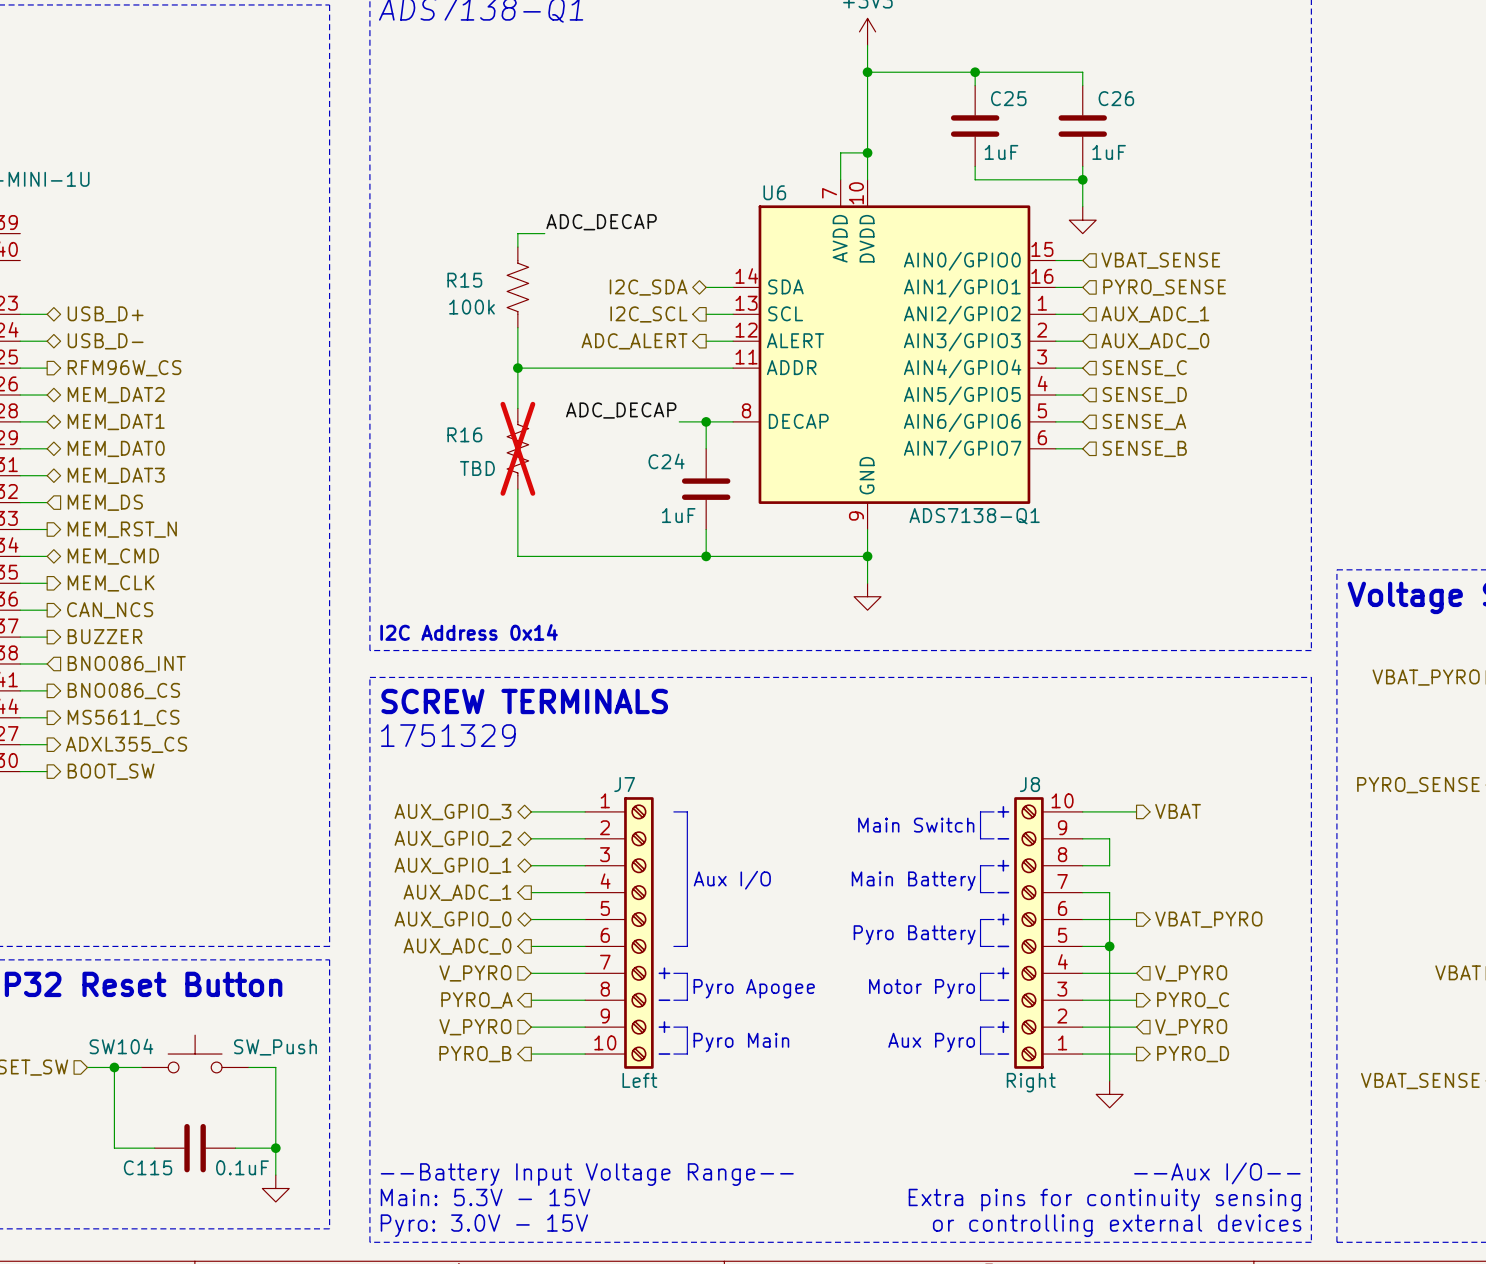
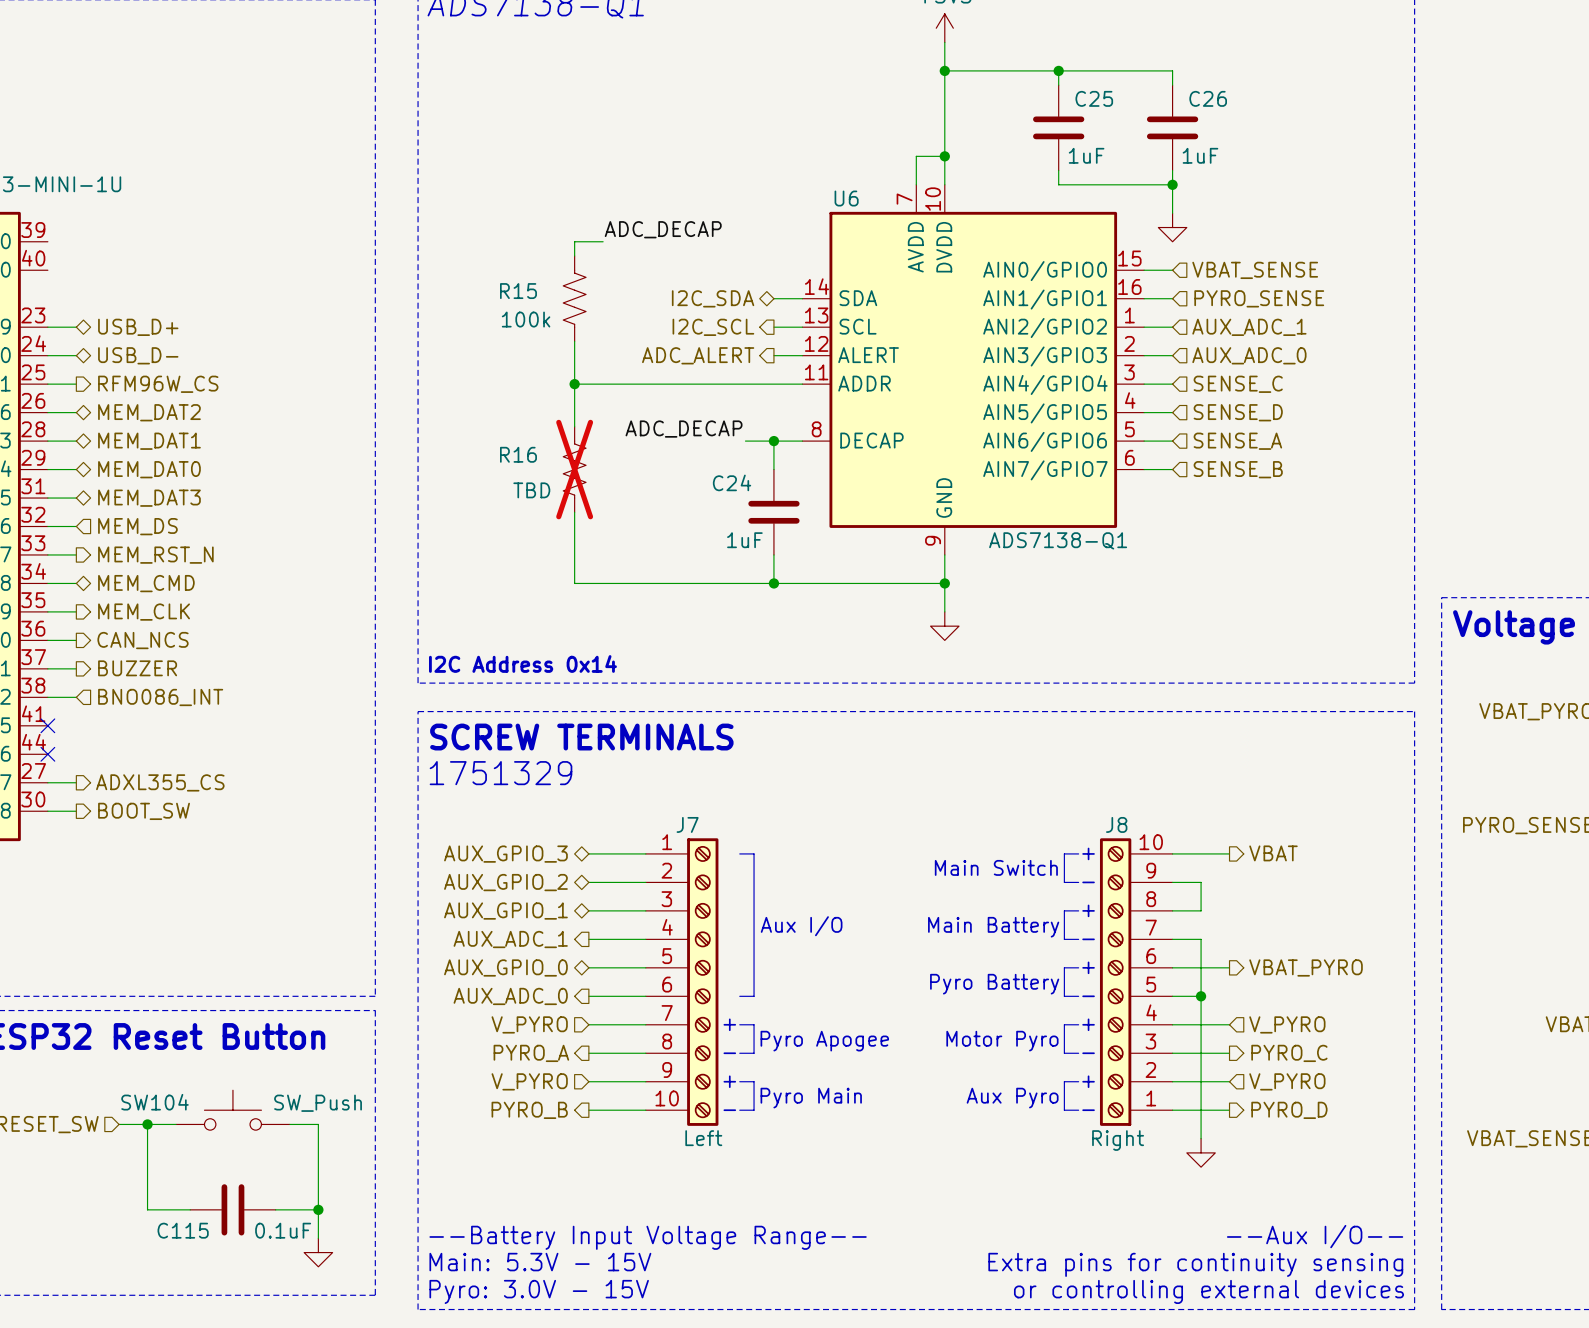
wire: (20, 690) (47, 690) -> none
no-connect mark: none -> (47, 725)
hierarchical label: BNO086_CS (123, 691) -> none
wire: (20, 717) (47, 717) -> none
no-connect mark: none -> (47, 754)
hierarchical label: MS5611_CS (123, 717) -> none

